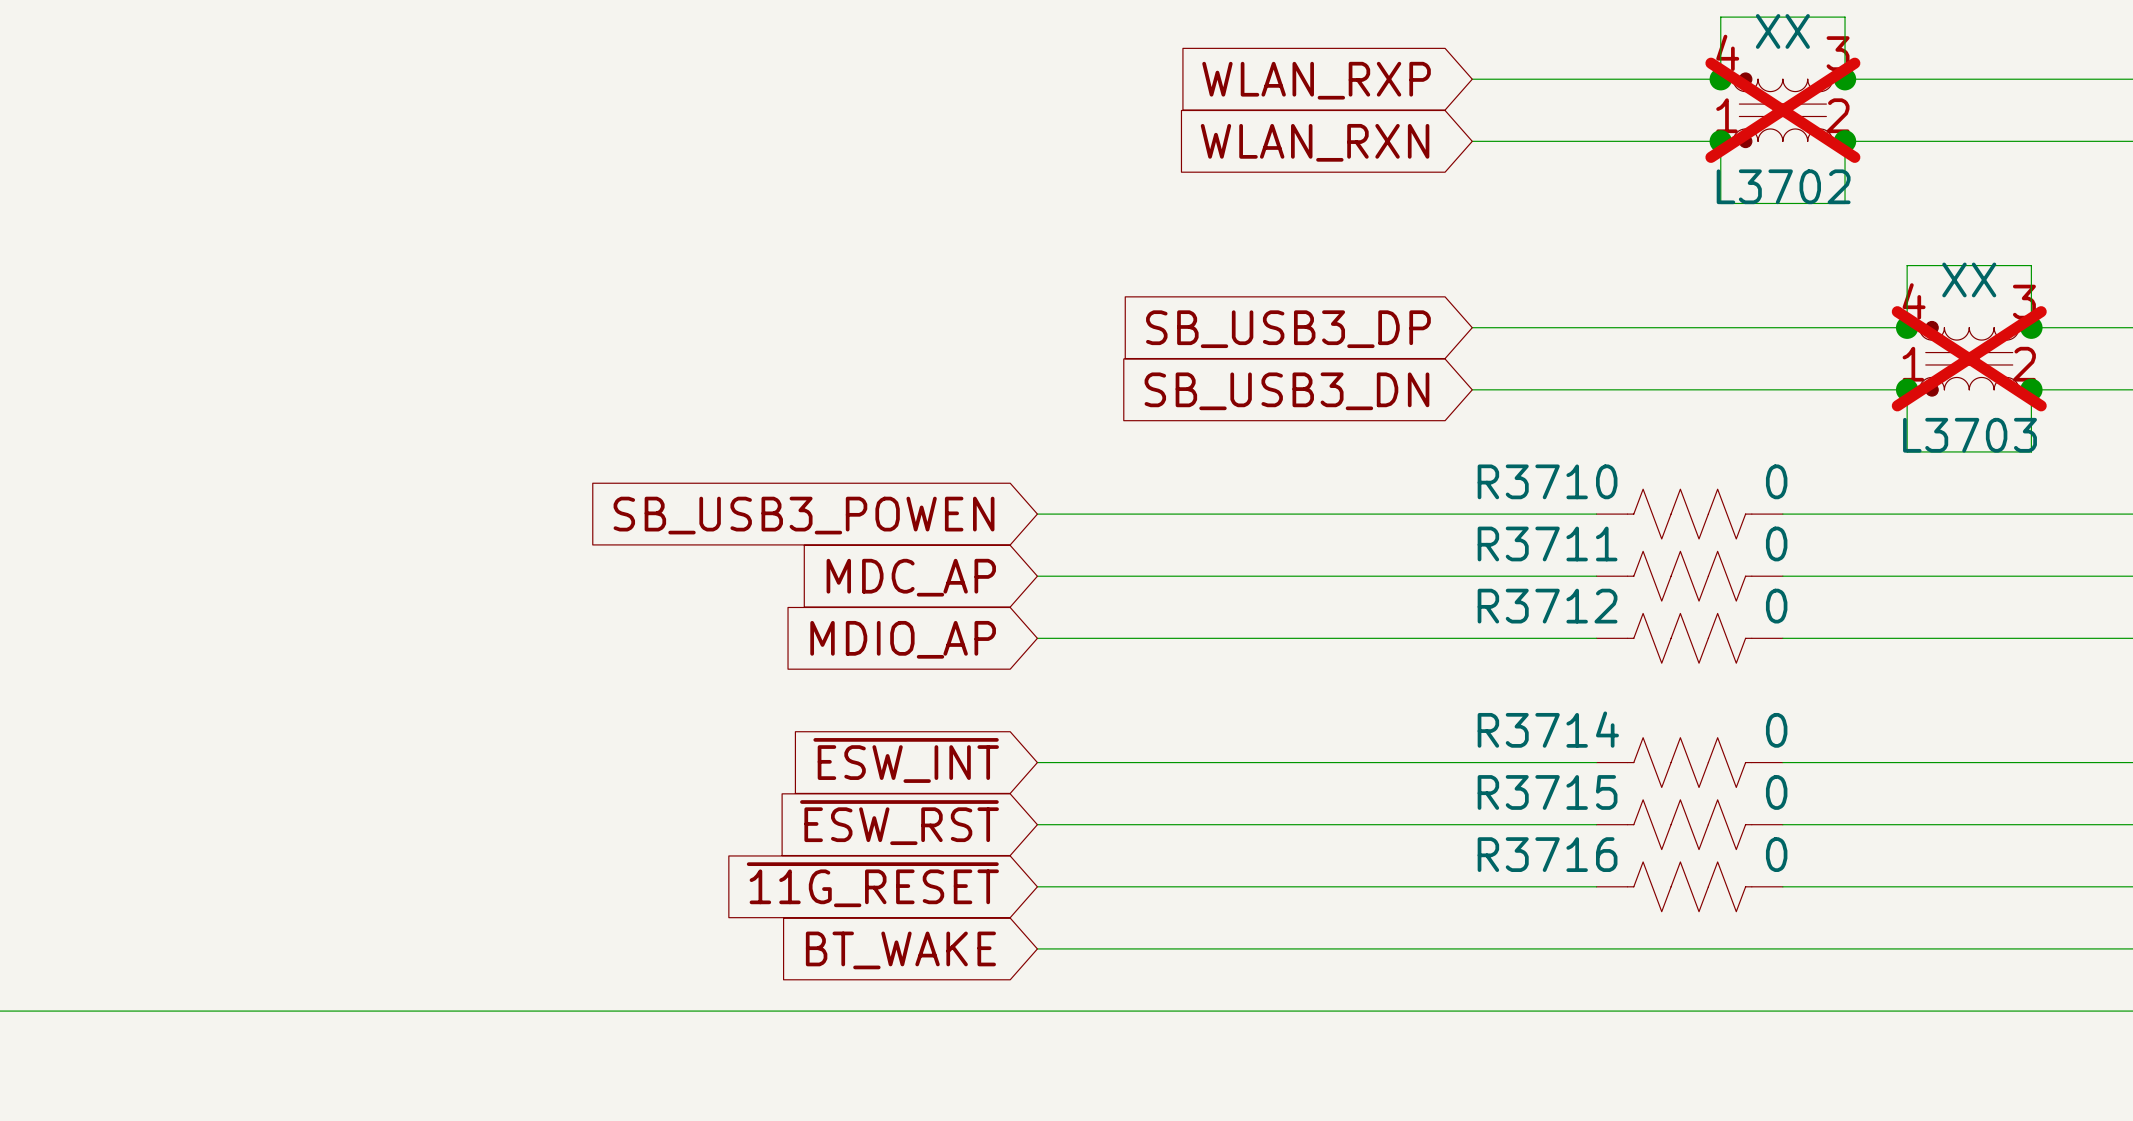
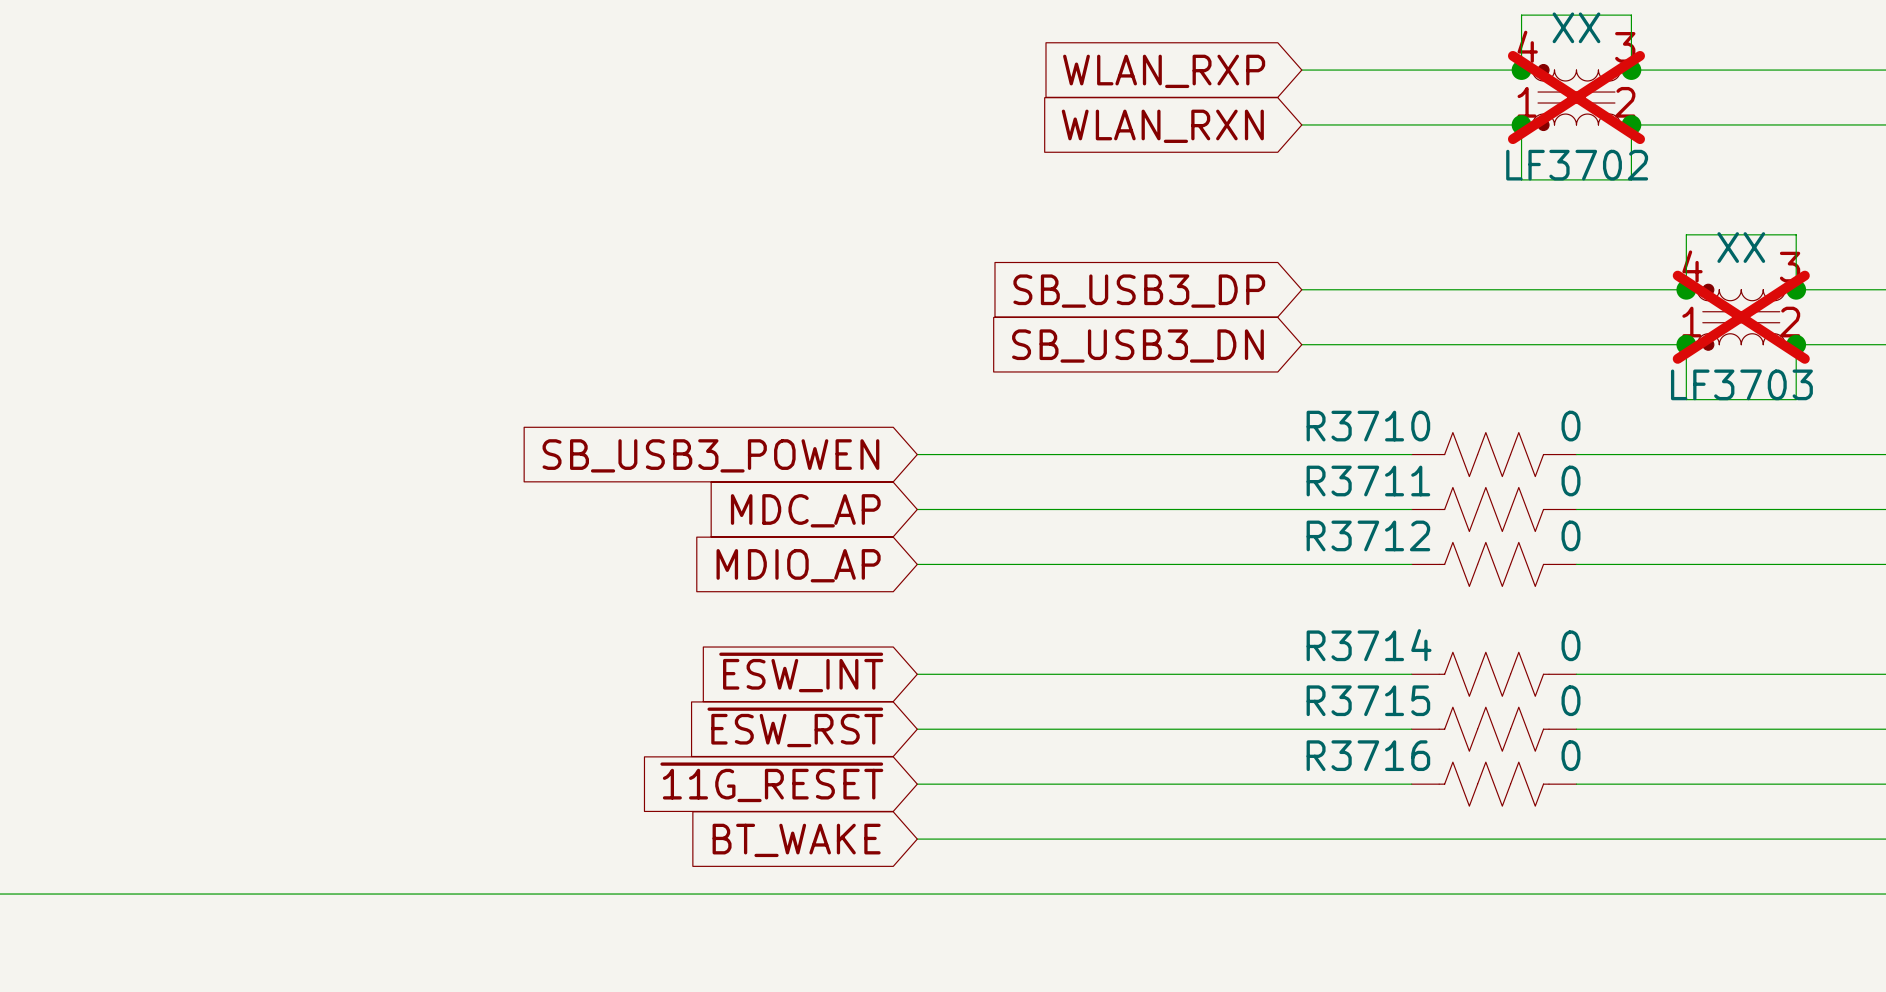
L3702 name: L3702 (1783, 186) -> LF3702 (1577, 165)
L3703 name: L3703 (1969, 435) -> LF3703 (1741, 384)

